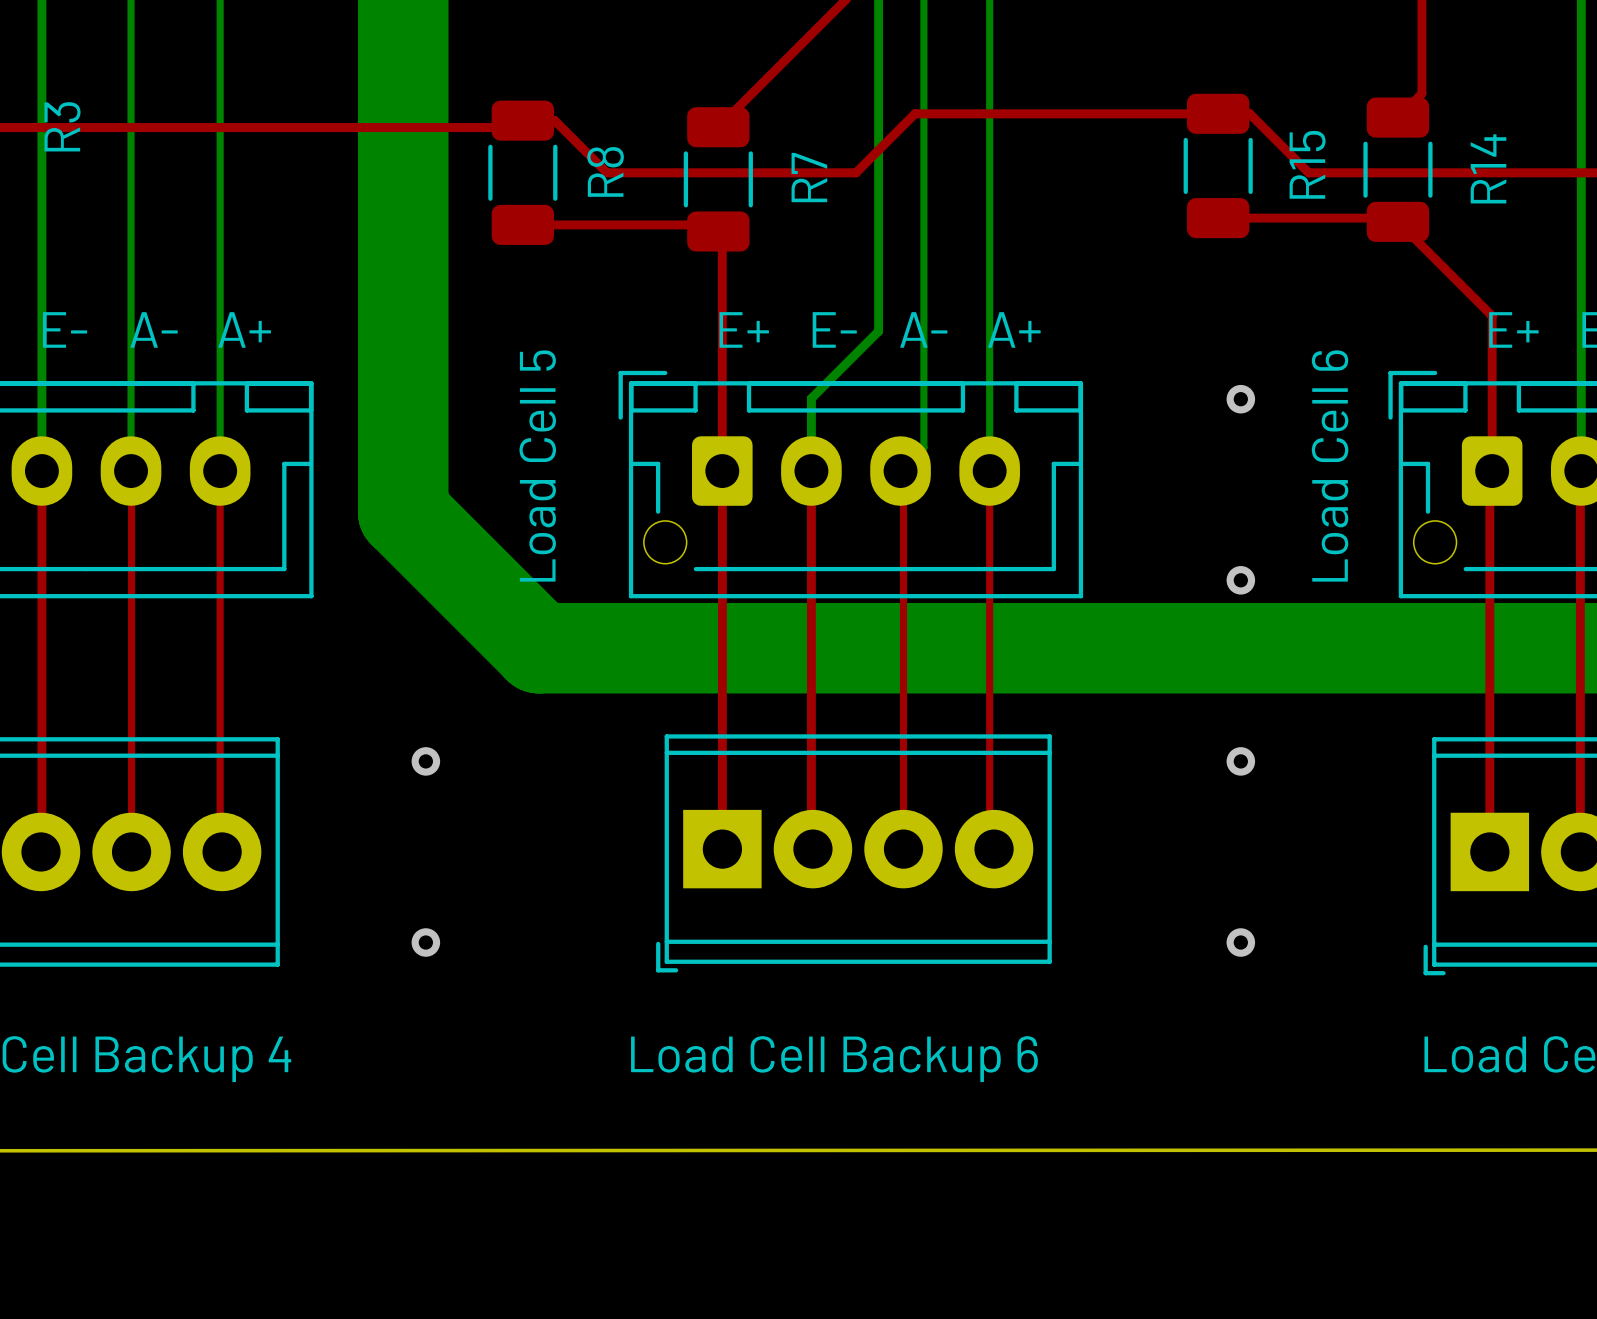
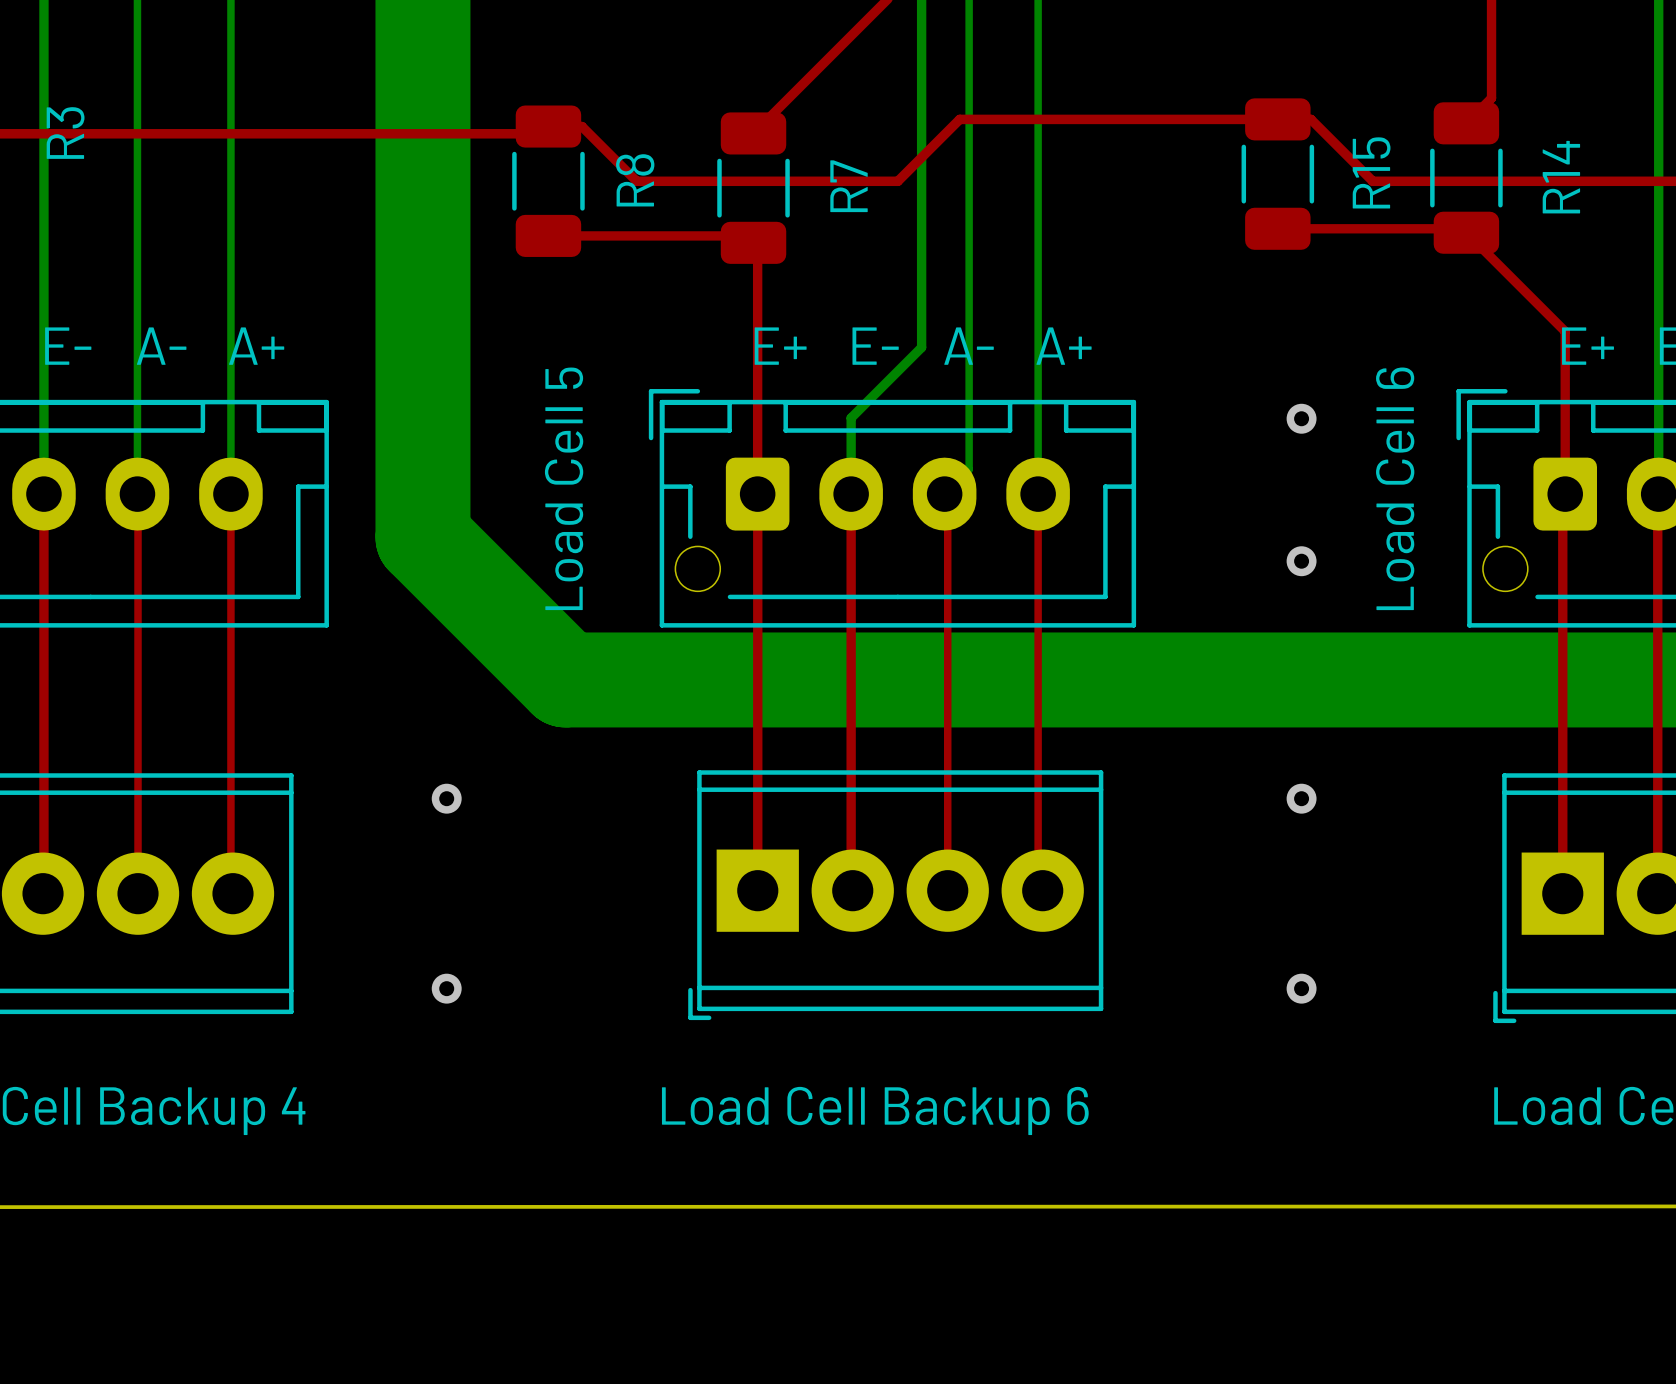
via position: (1240, 580) -> (1301, 561)

